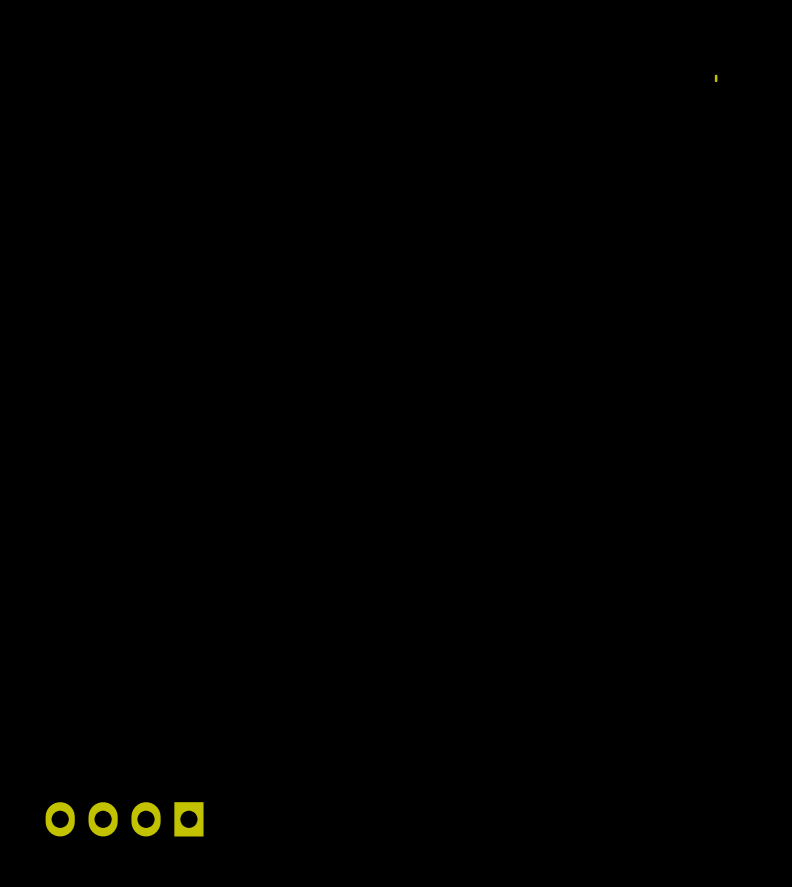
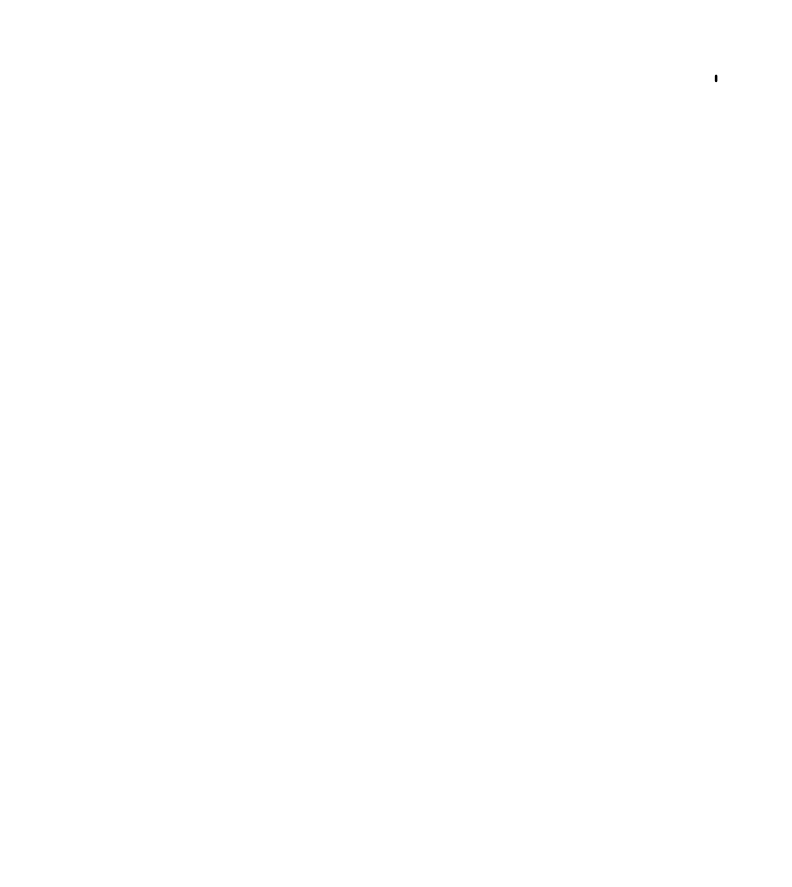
part: (124, 819) -> none

